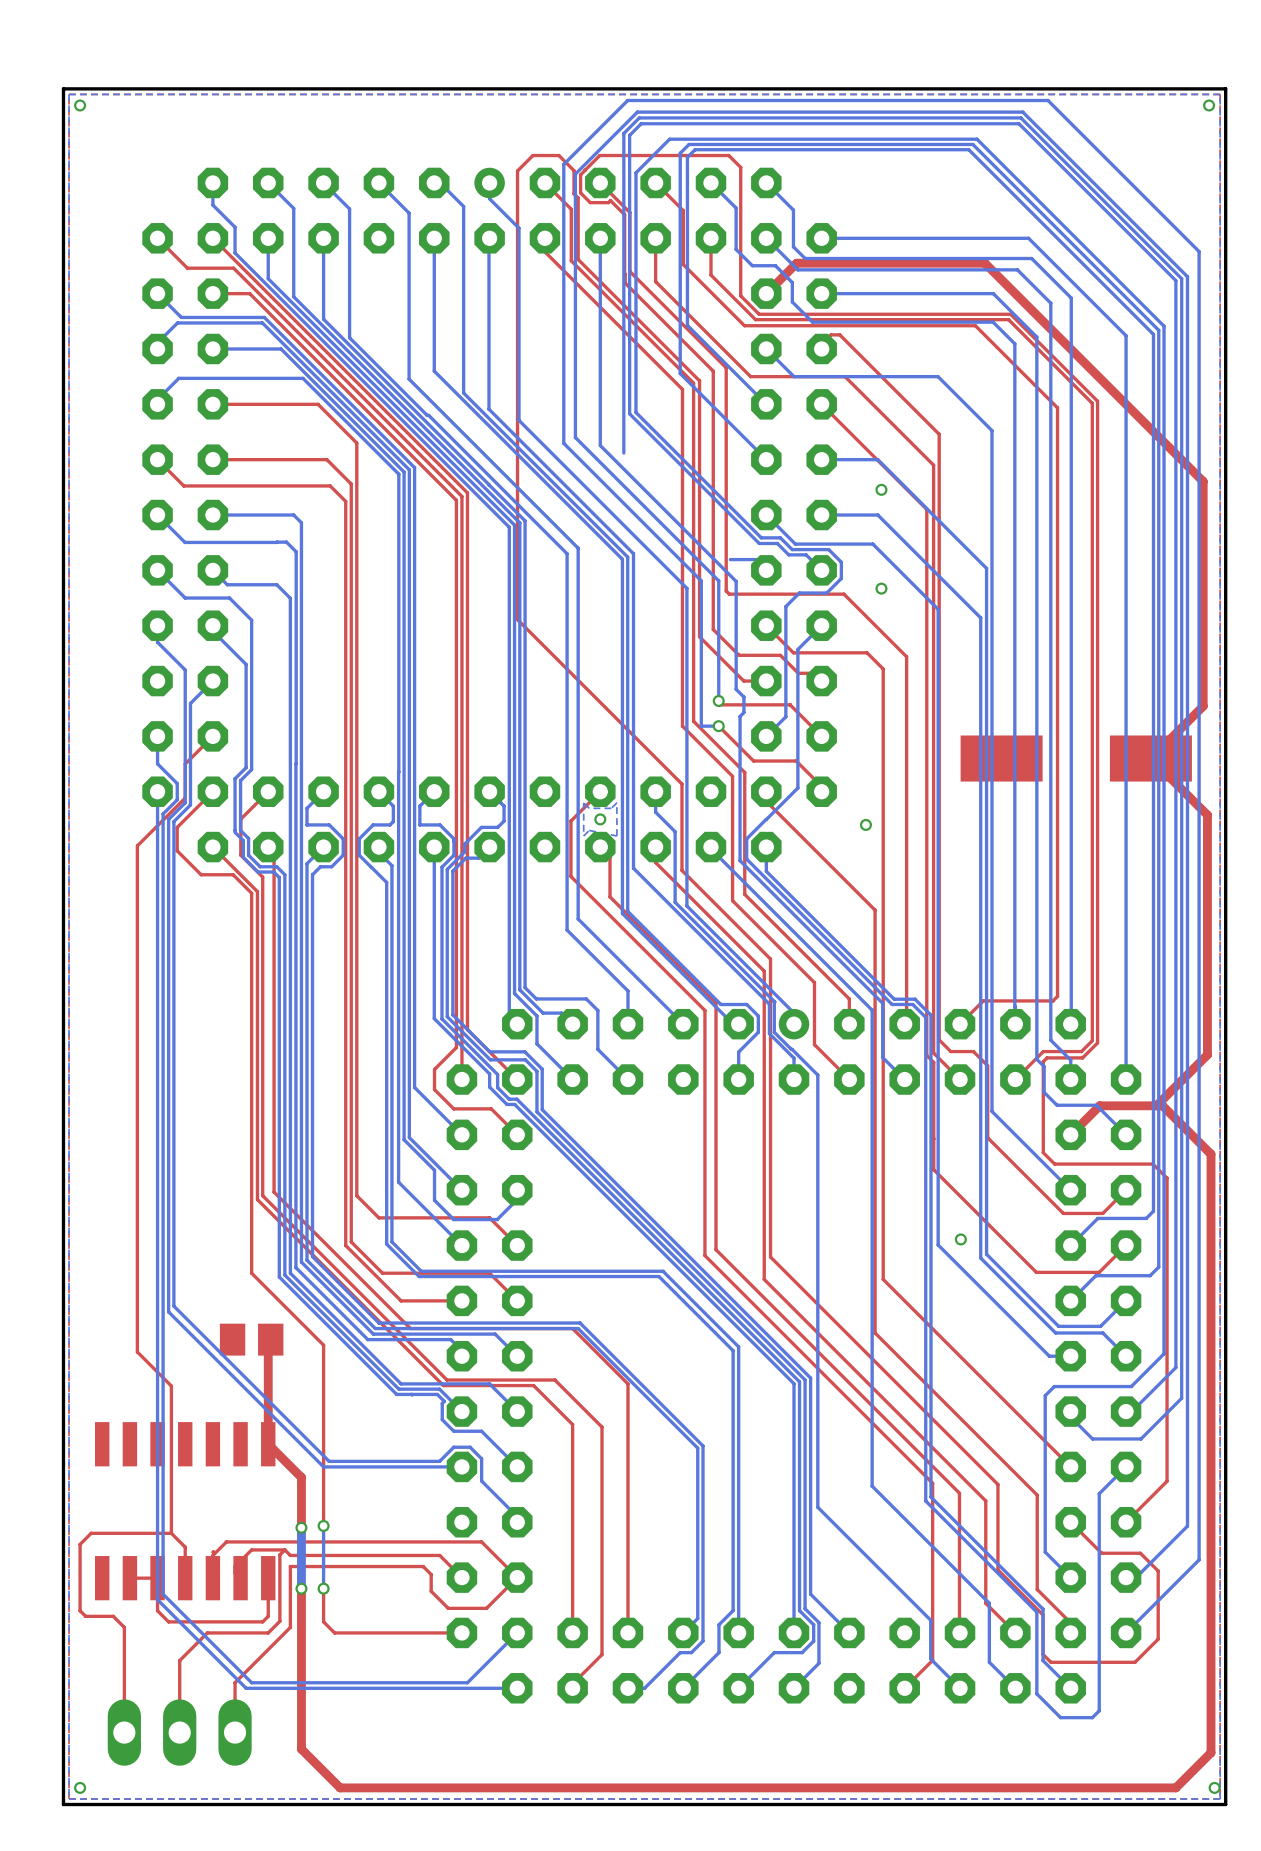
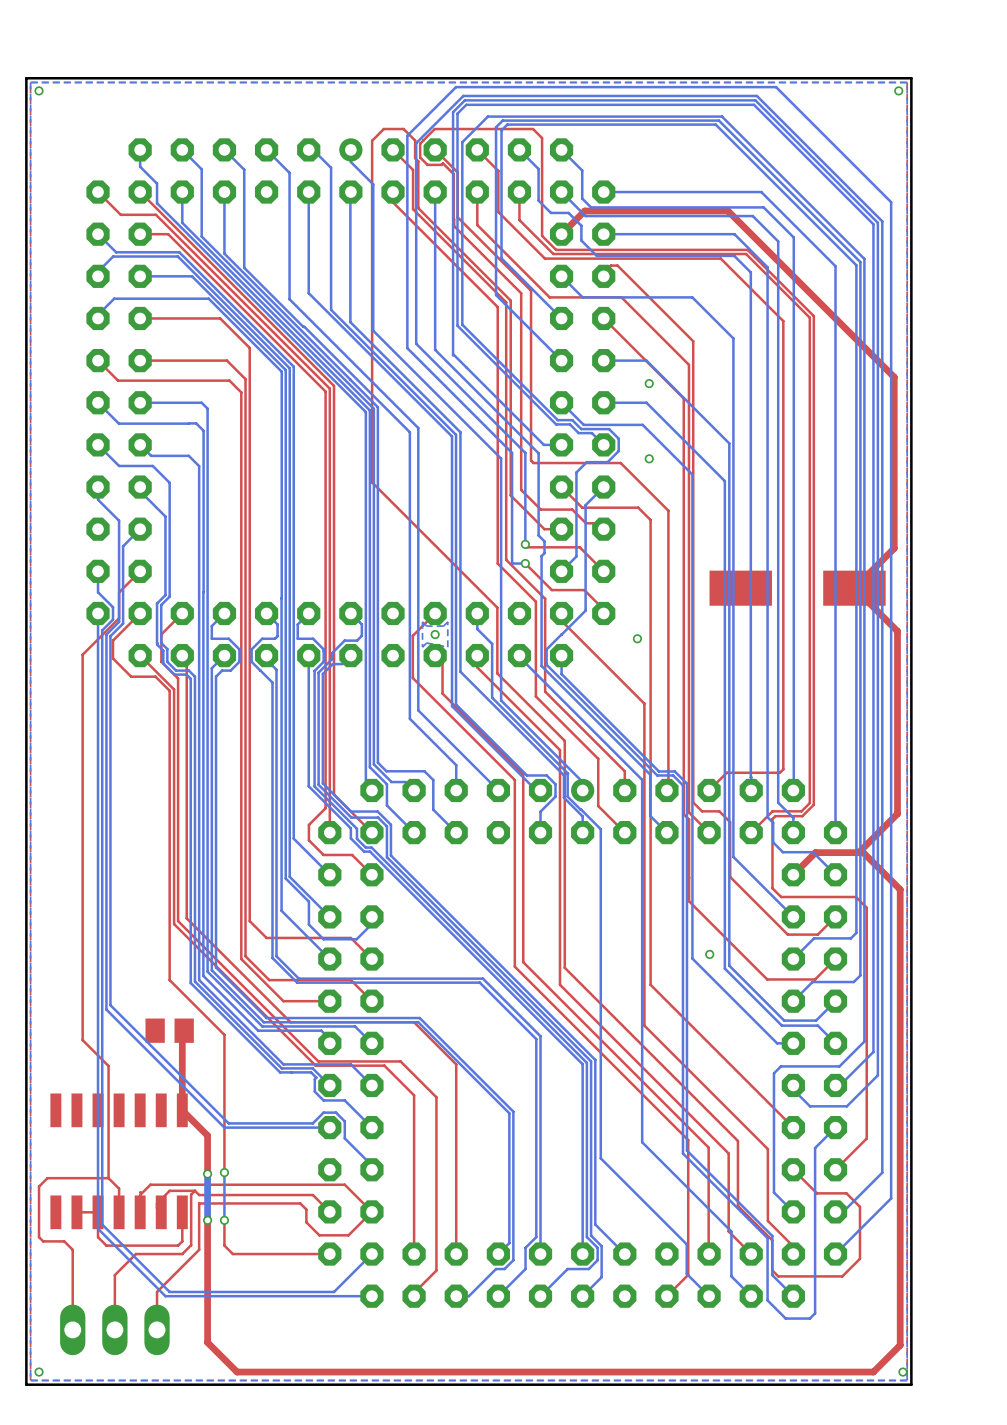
bottom track: (730, 559) (755, 559) (766, 570) -> (453, 354) (543, 444) (561, 444)

